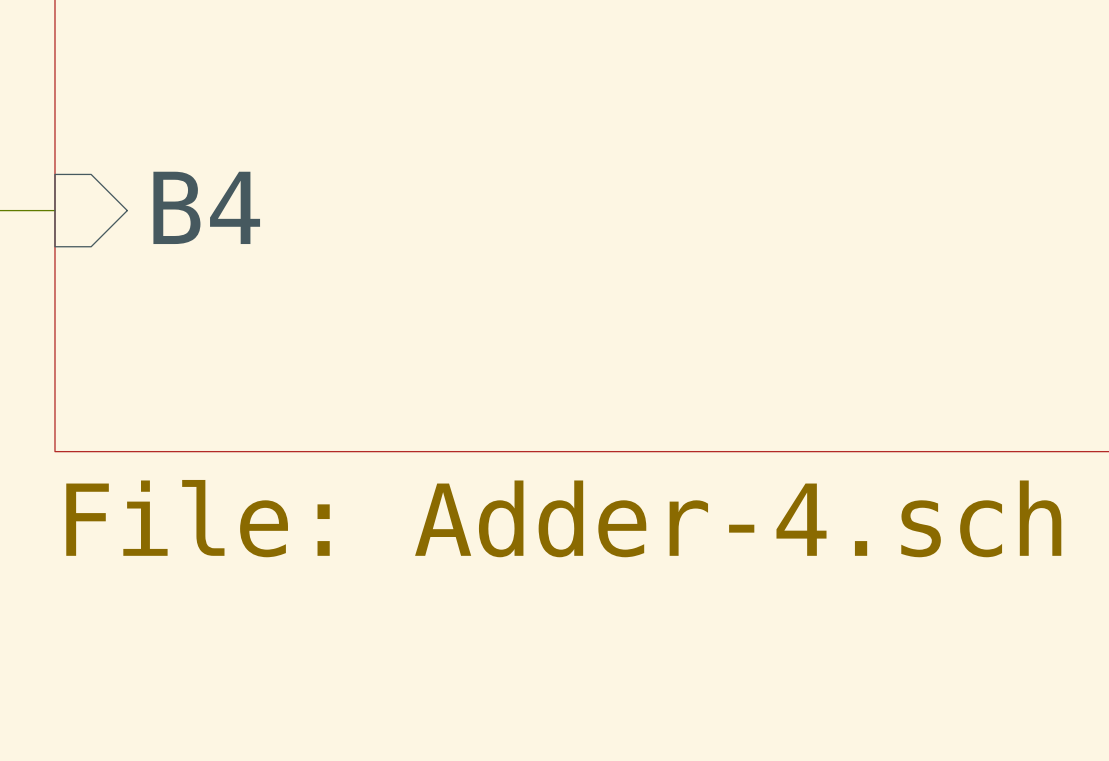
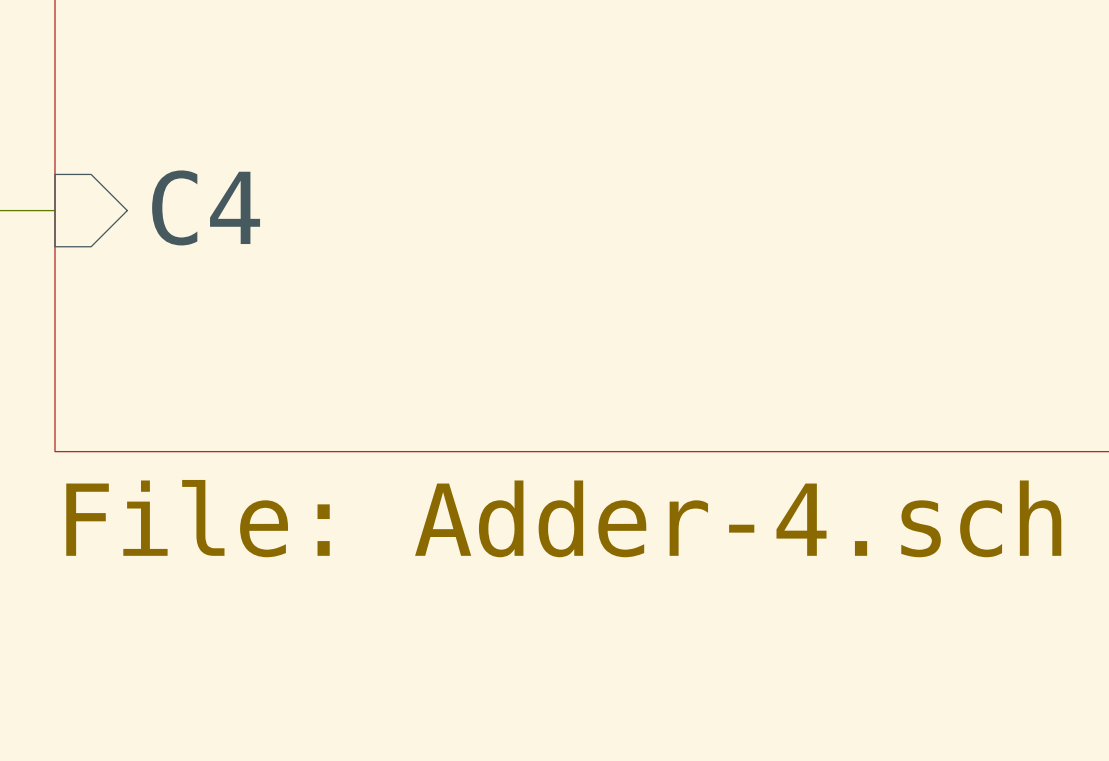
sheet pin: B4 (206, 207) -> C4 (206, 207)

